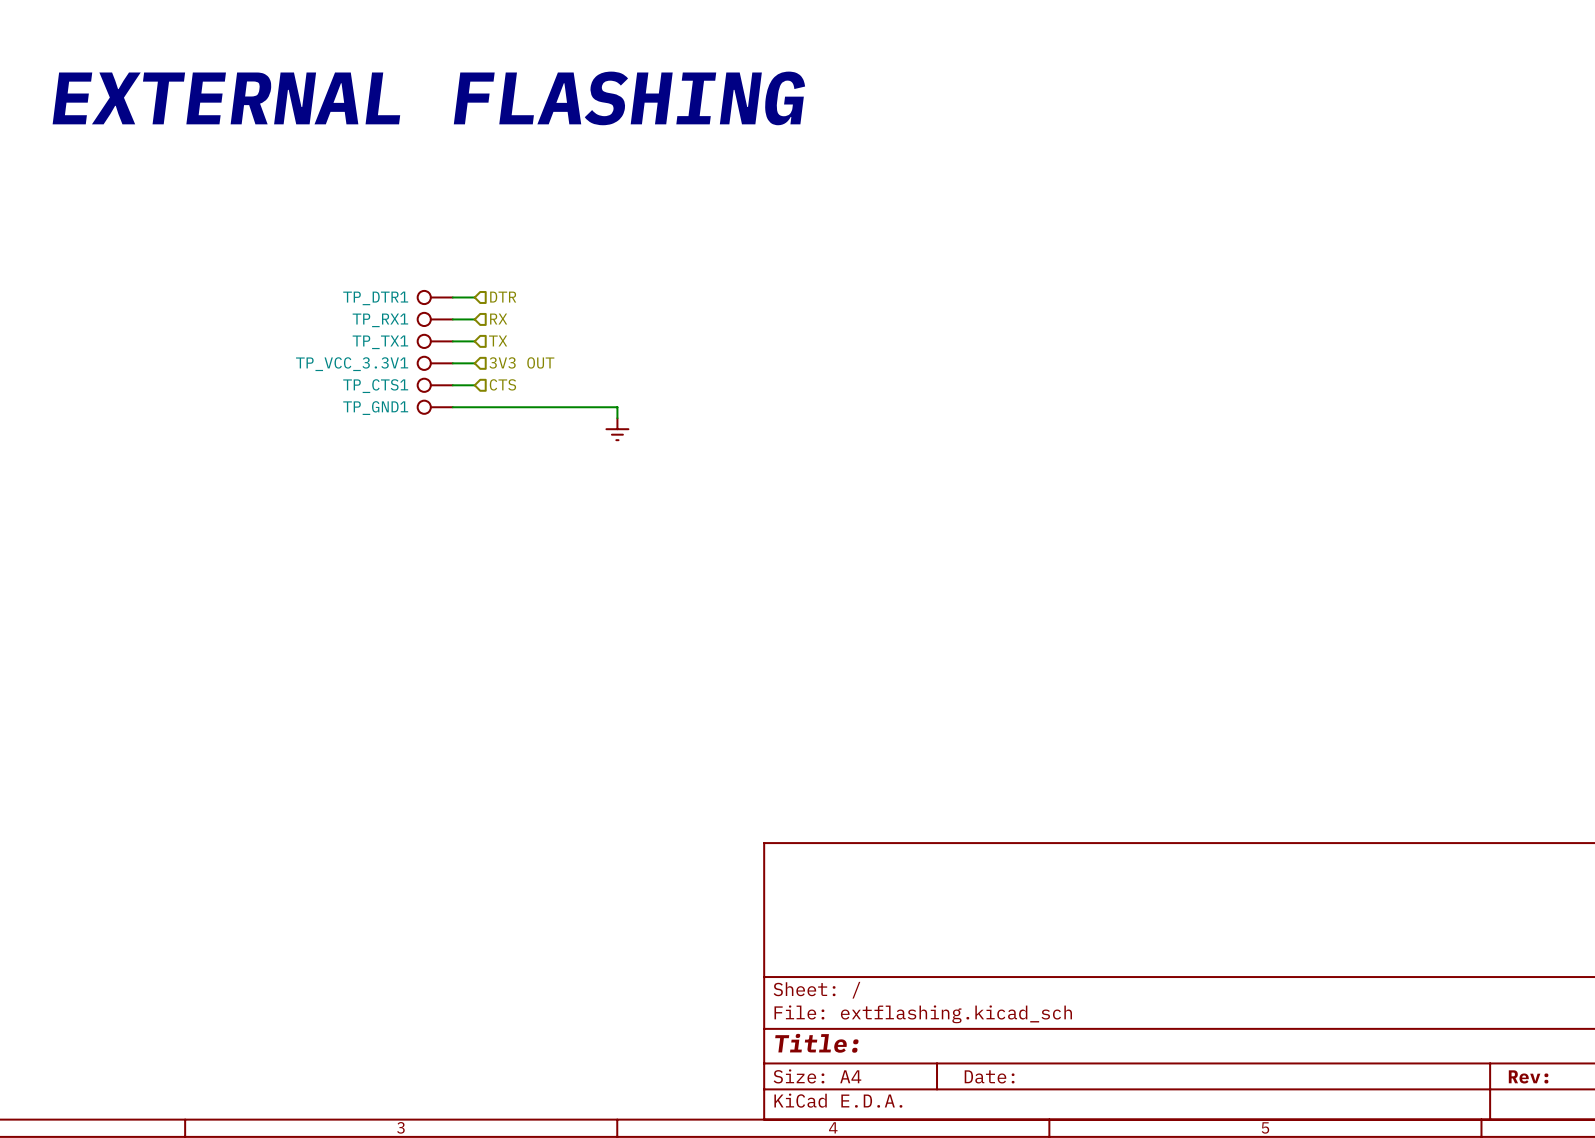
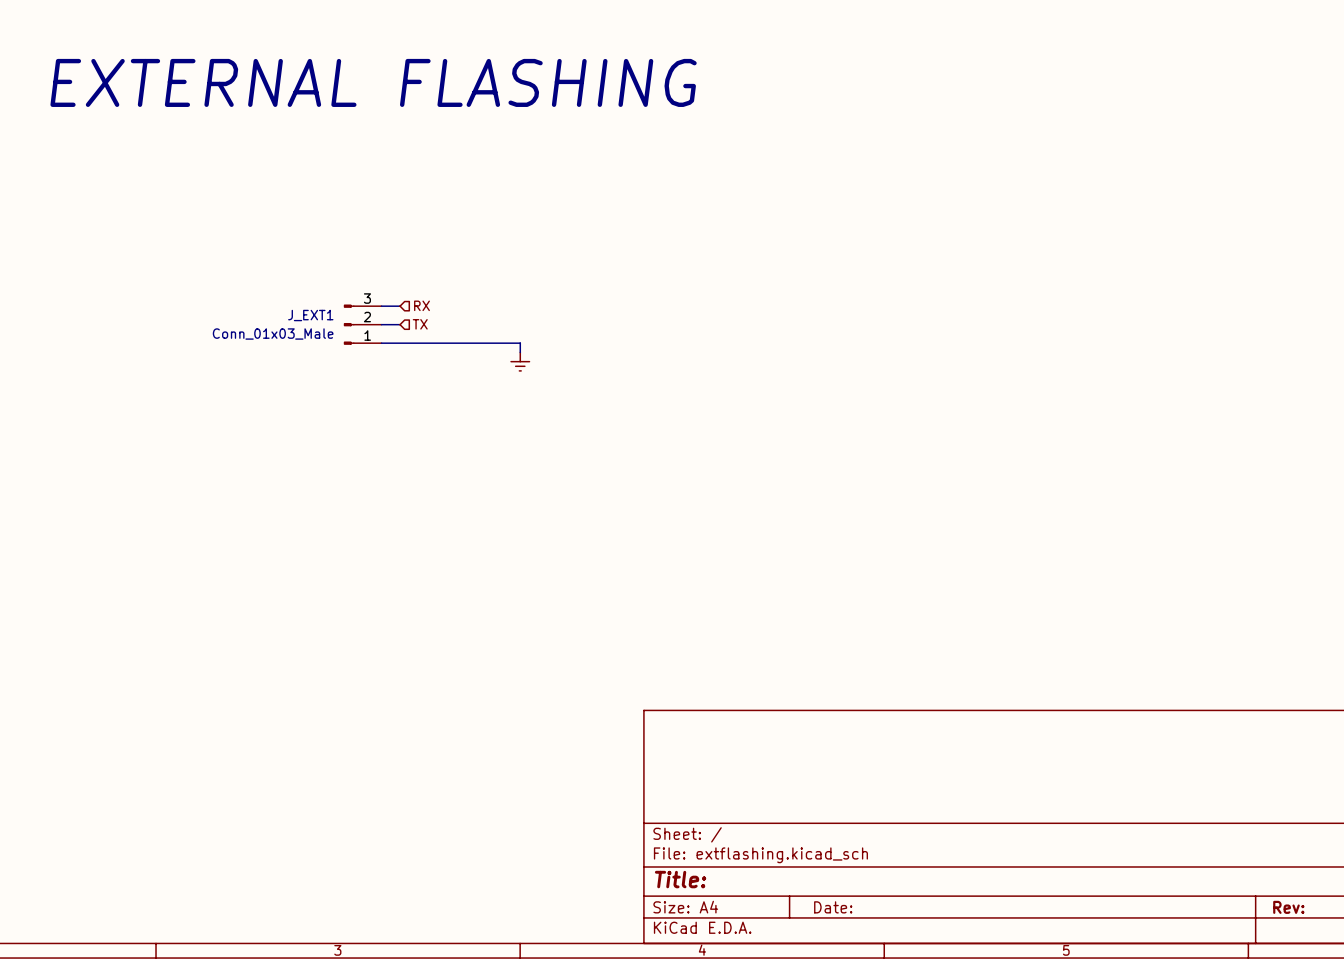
TP_DTR1: (435, 297) -> none
wire: (452, 297) (474, 297) -> none
hierarchical label: DTR (503, 297) -> none
TP_RX1: (435, 319) -> none
wire: (452, 319) (474, 319) -> none
hierarchical label: RX (498, 319) -> none
hierarchical label: TX (498, 340) -> none
TP_TX1: (435, 341) -> none
wire: (452, 341) (474, 341) -> none
hierarchical label: 3V3 OUT (521, 362) -> RX (421, 305)
TP_VCC_3.3V1: (435, 363) -> none
hierarchical label: CTS (502, 384) -> TX (420, 324)
J_EXT1: none -> Conn_01x03_Male (362, 324)
TP_CTS1: (435, 385) -> none
TP_GND1: (435, 407) -> none

